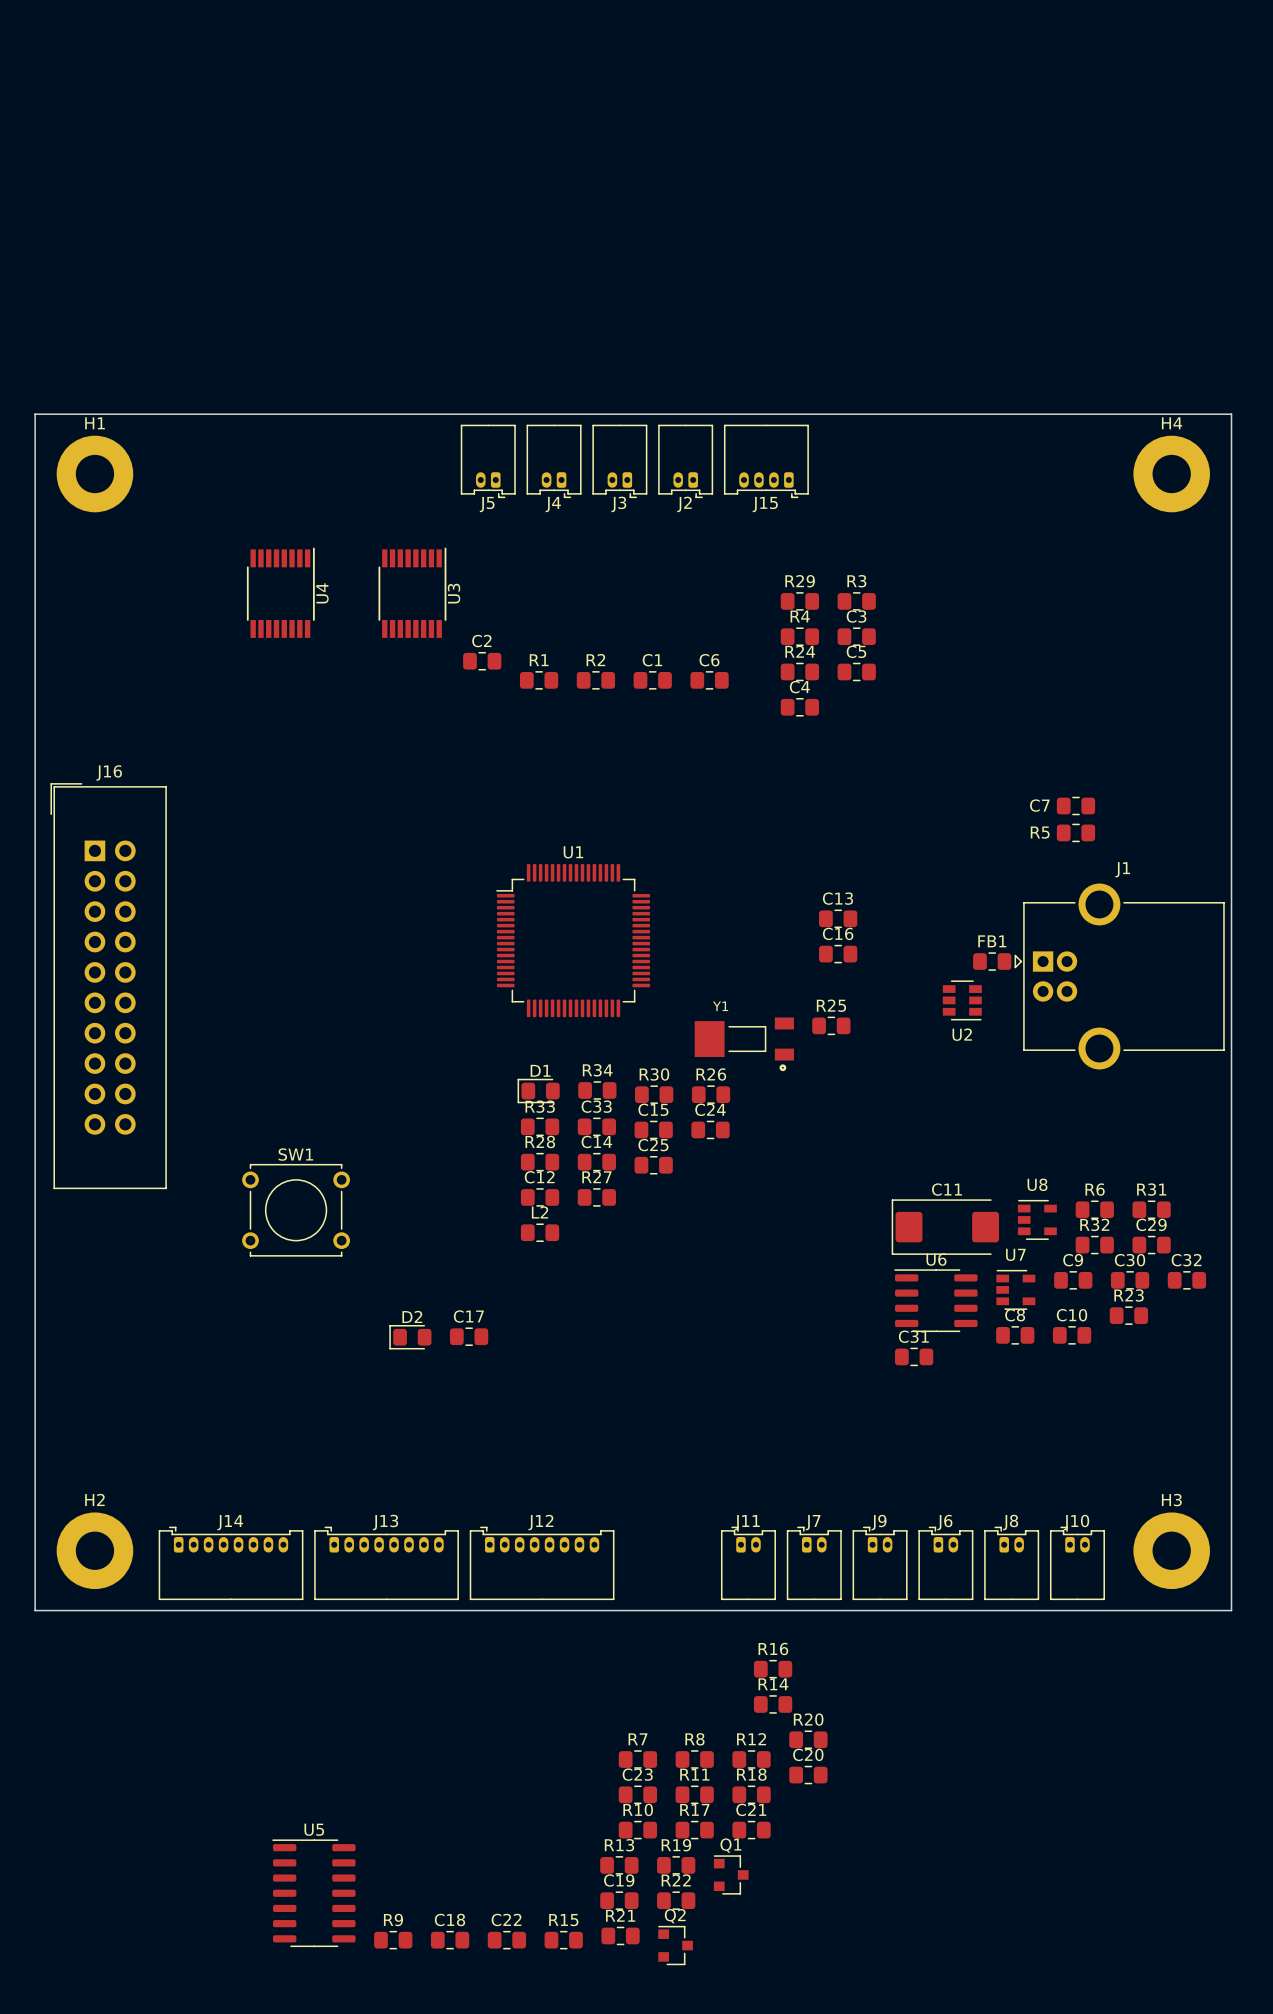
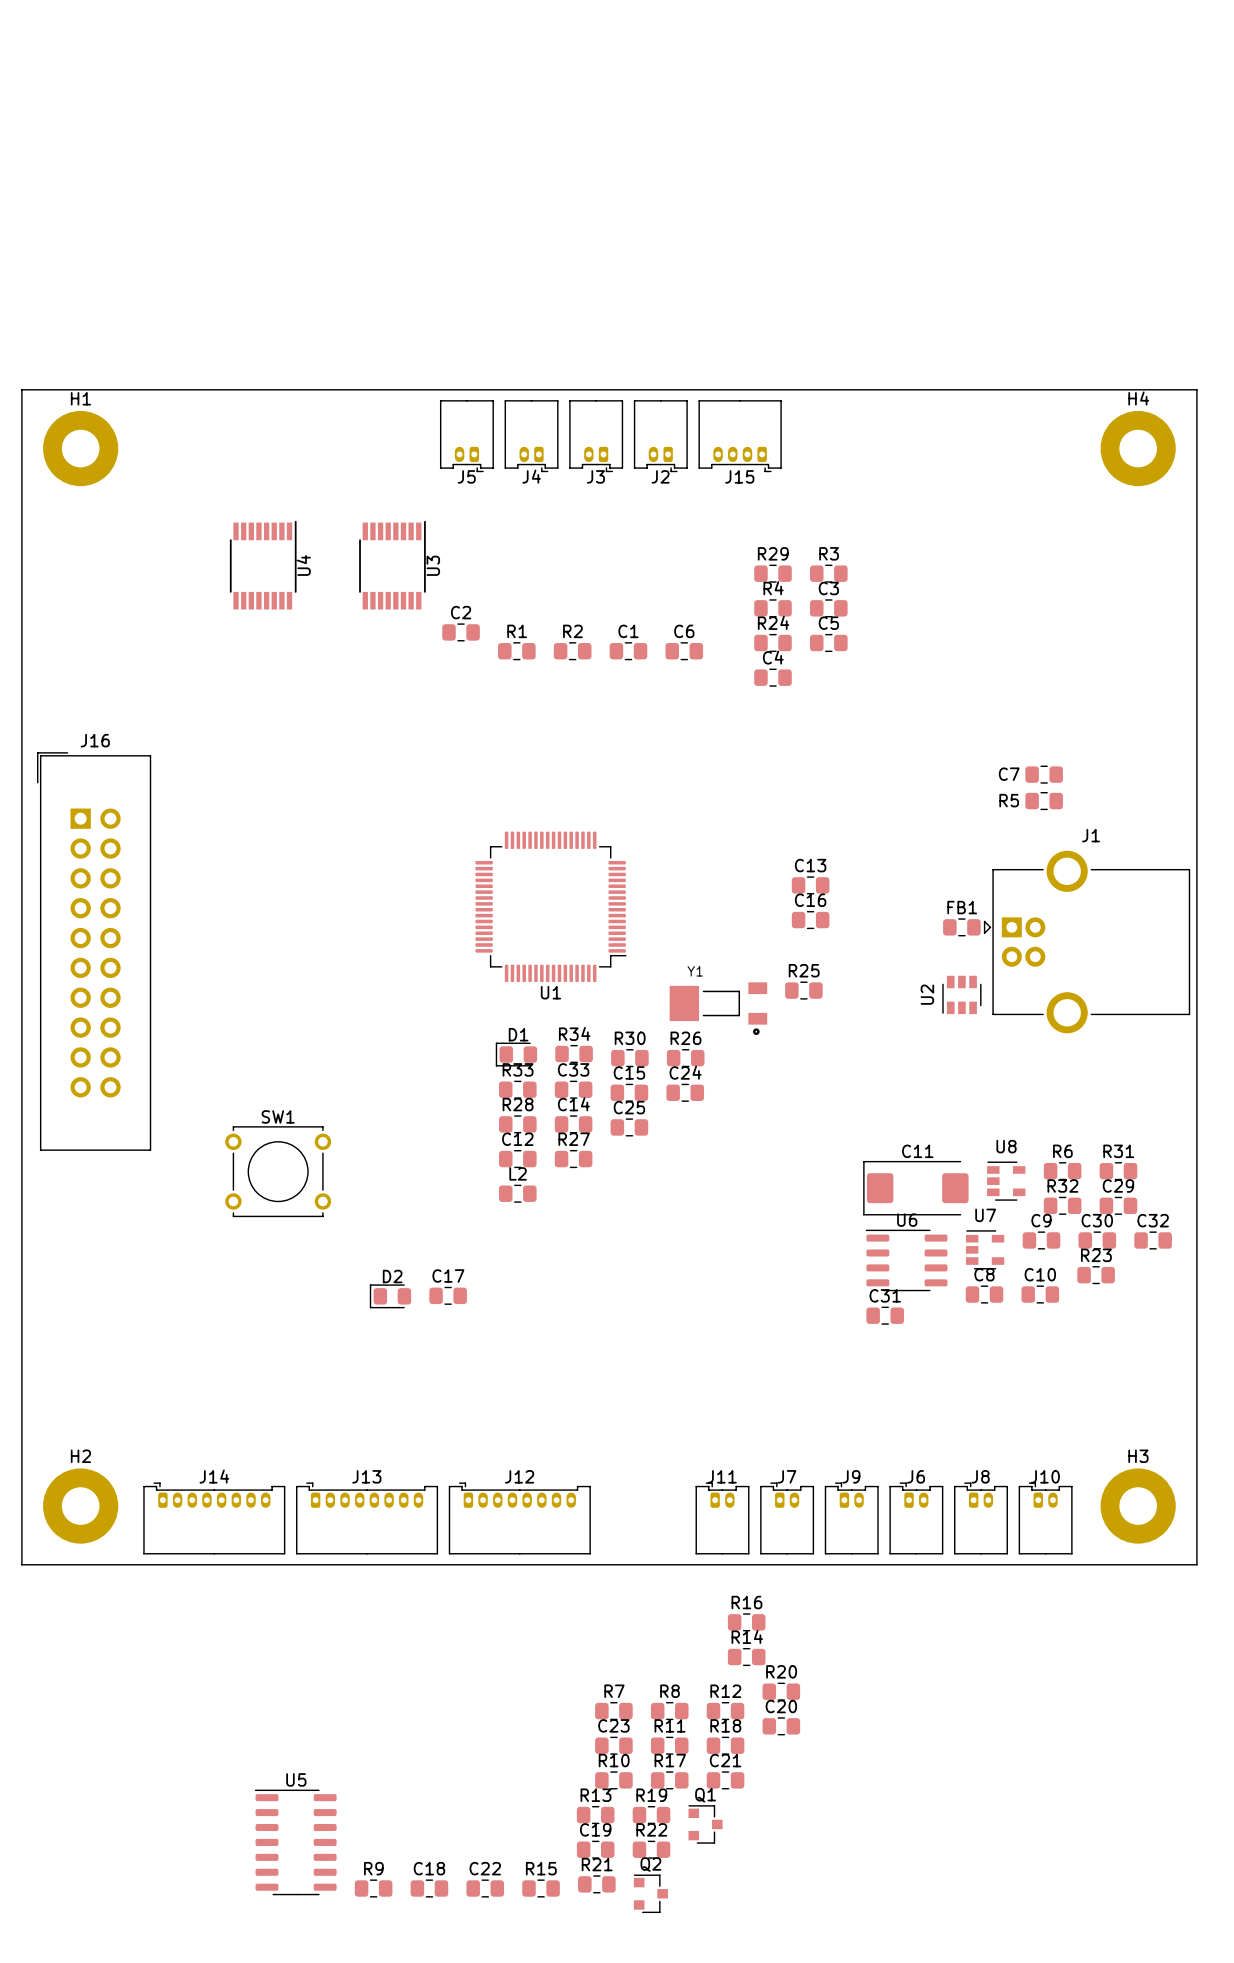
U1 rotation: 0° (573, 940) -> 180° (551, 906)
U2 rotation: 0° (962, 1000) -> 90° clockwise (961, 994)
U2 position: (962, 1000) -> (961, 994)

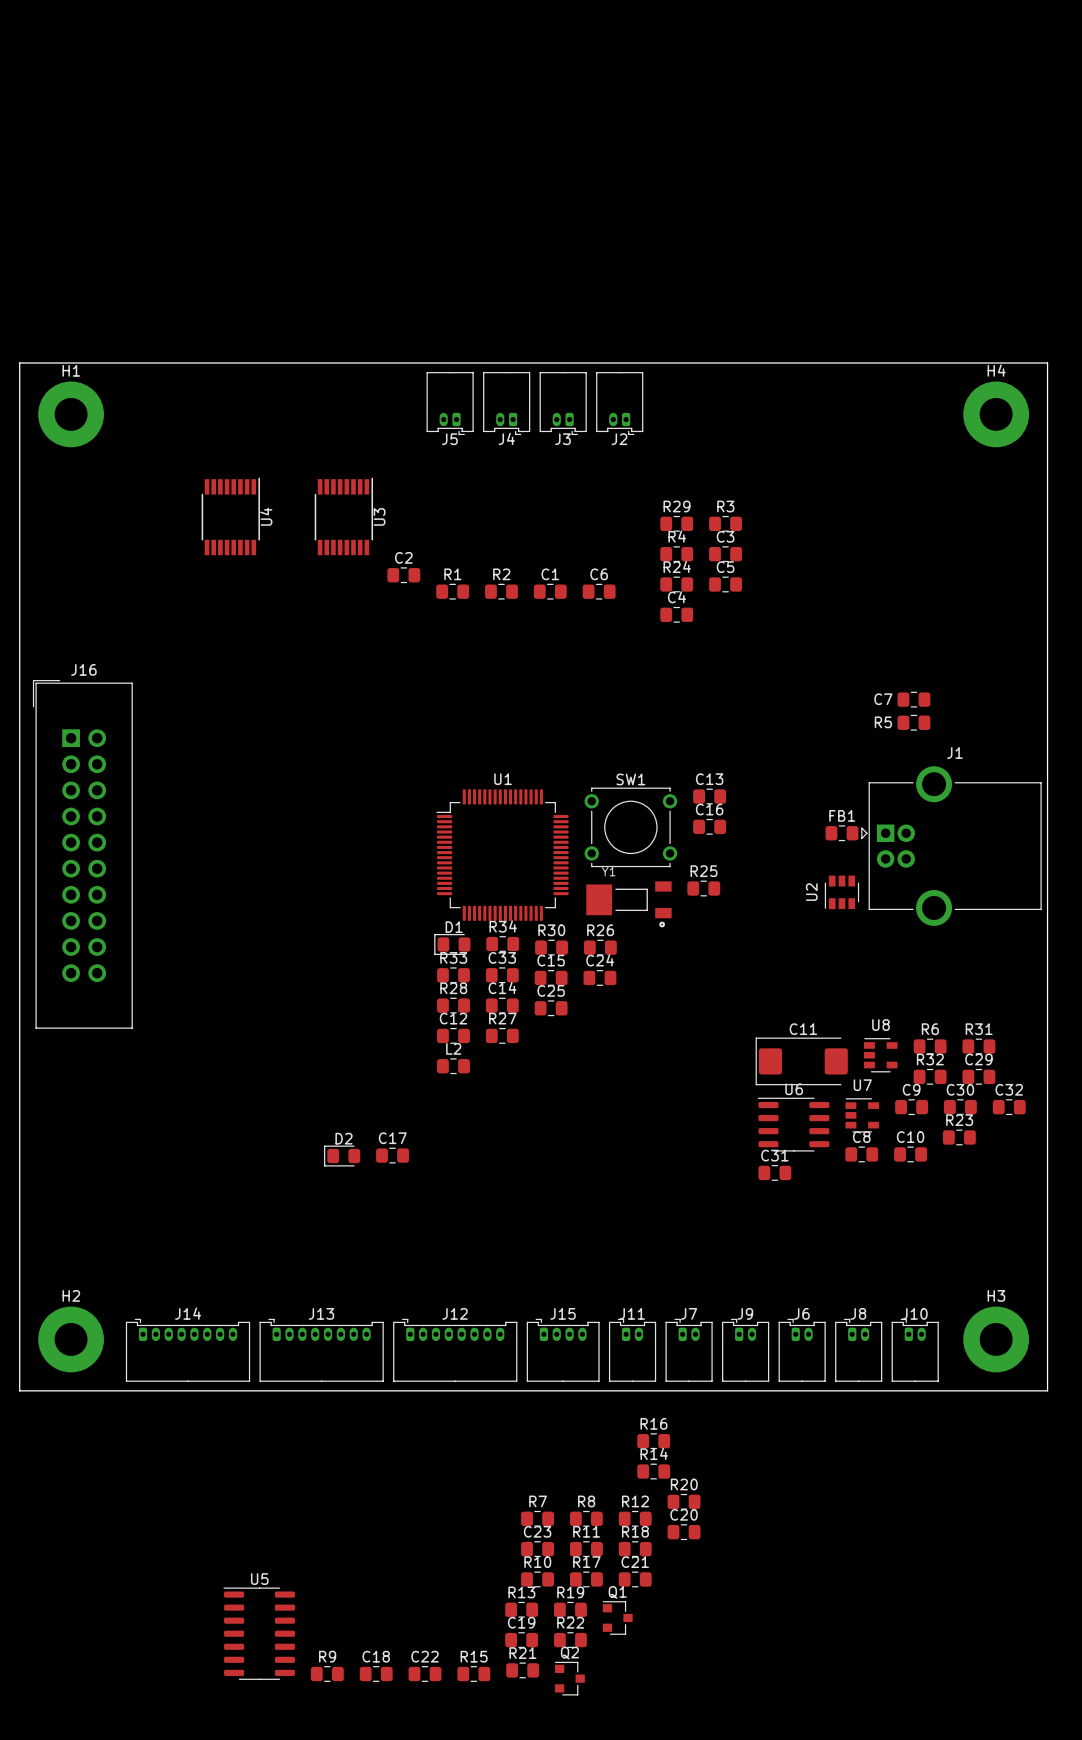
J5 position: (466, 436) -> (450, 403)
J4 position: (531, 436) -> (506, 403)
J3 position: (596, 436) -> (563, 403)
J2 position: (660, 436) -> (619, 403)
J15 rotation: 0° (740, 436) -> 180° (563, 1350)
J15 position: (740, 436) -> (563, 1350)
U1 rotation: 0° (551, 906) -> 180° (502, 855)
SW1 position: (278, 1171) -> (630, 827)

